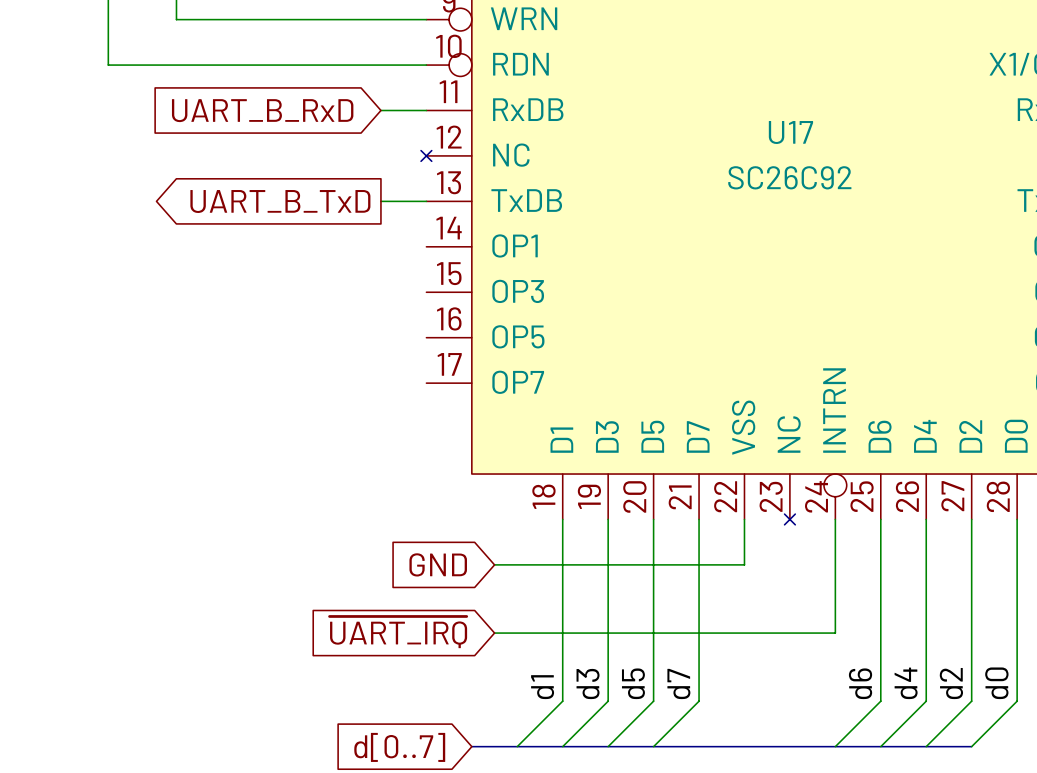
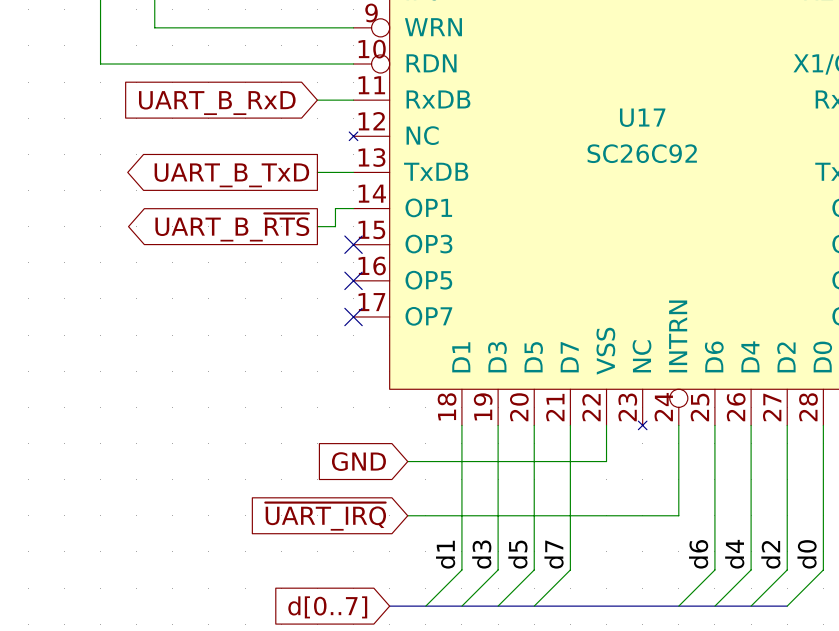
wire: none -> (353, 208) (335, 208) (335, 226) (317, 226)
global label: none -> UART_B_~{RTS} (232, 227)
no-connect mark: none -> (353, 244)
no-connect mark: none -> (353, 280)
no-connect mark: none -> (353, 316)

